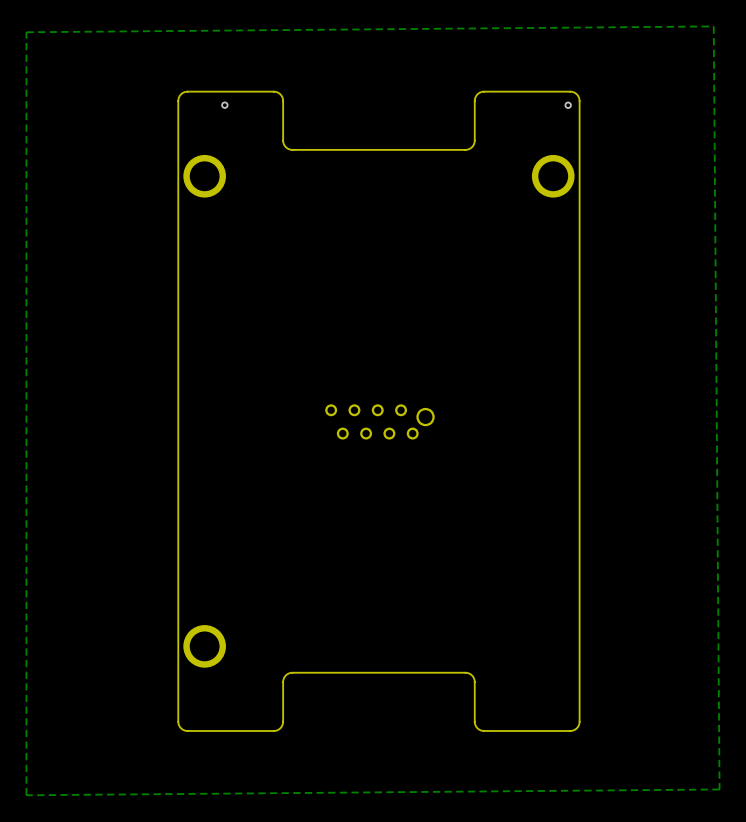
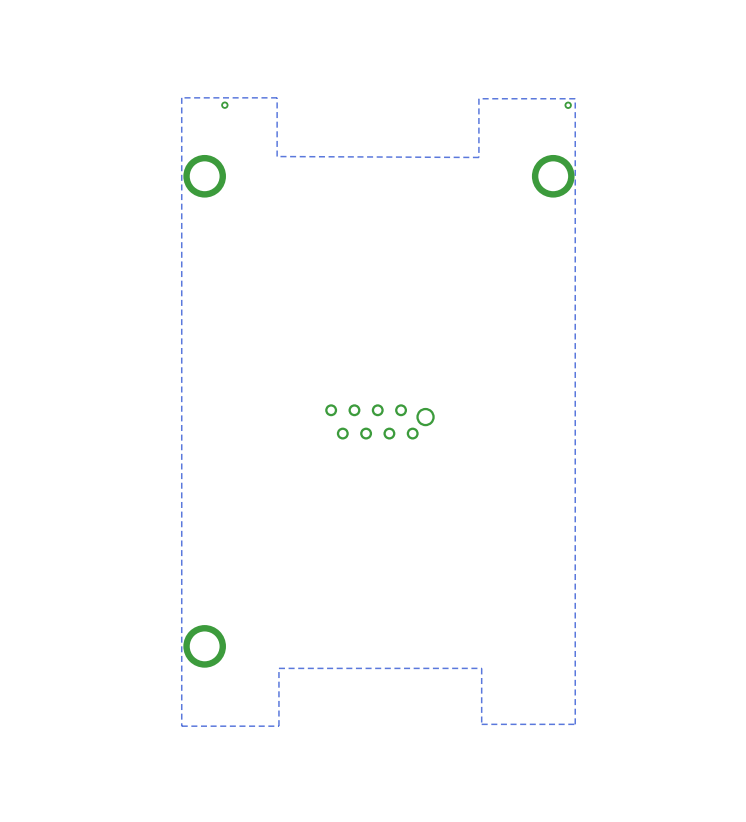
zone outline: (713, 26) (719, 789) (26, 795) (26, 32) (713, 26) -> none
board edge: (484, 91) (478, 93) (475, 98) (474, 141) (472, 146) (467, 149) (292, 149) (285, 147) (283, 140) -> none
board edge: (484, 91) (571, 91) (577, 95) (579, 100) -> none
zone outline: none -> (277, 97) (181, 97) (181, 726) (278, 726) (278, 668) (481, 668) (481, 724) (575, 724) (575, 98) (478, 98) (478, 157) (277, 156) (277, 97)
board edge: (579, 100) (579, 721) (576, 728) (570, 730) -> none
board edge: (283, 140) (283, 99) (277, 92) (187, 91) (181, 93) (179, 97) (178, 721) -> none
board edge: (178, 721) (181, 728) (186, 730) (273, 730) -> none
board edge: (273, 730) (279, 729) (282, 724) (283, 680) (285, 675) (290, 673) (465, 672) (471, 674) (474, 679) (474, 722) (479, 729) (570, 730) -> none

